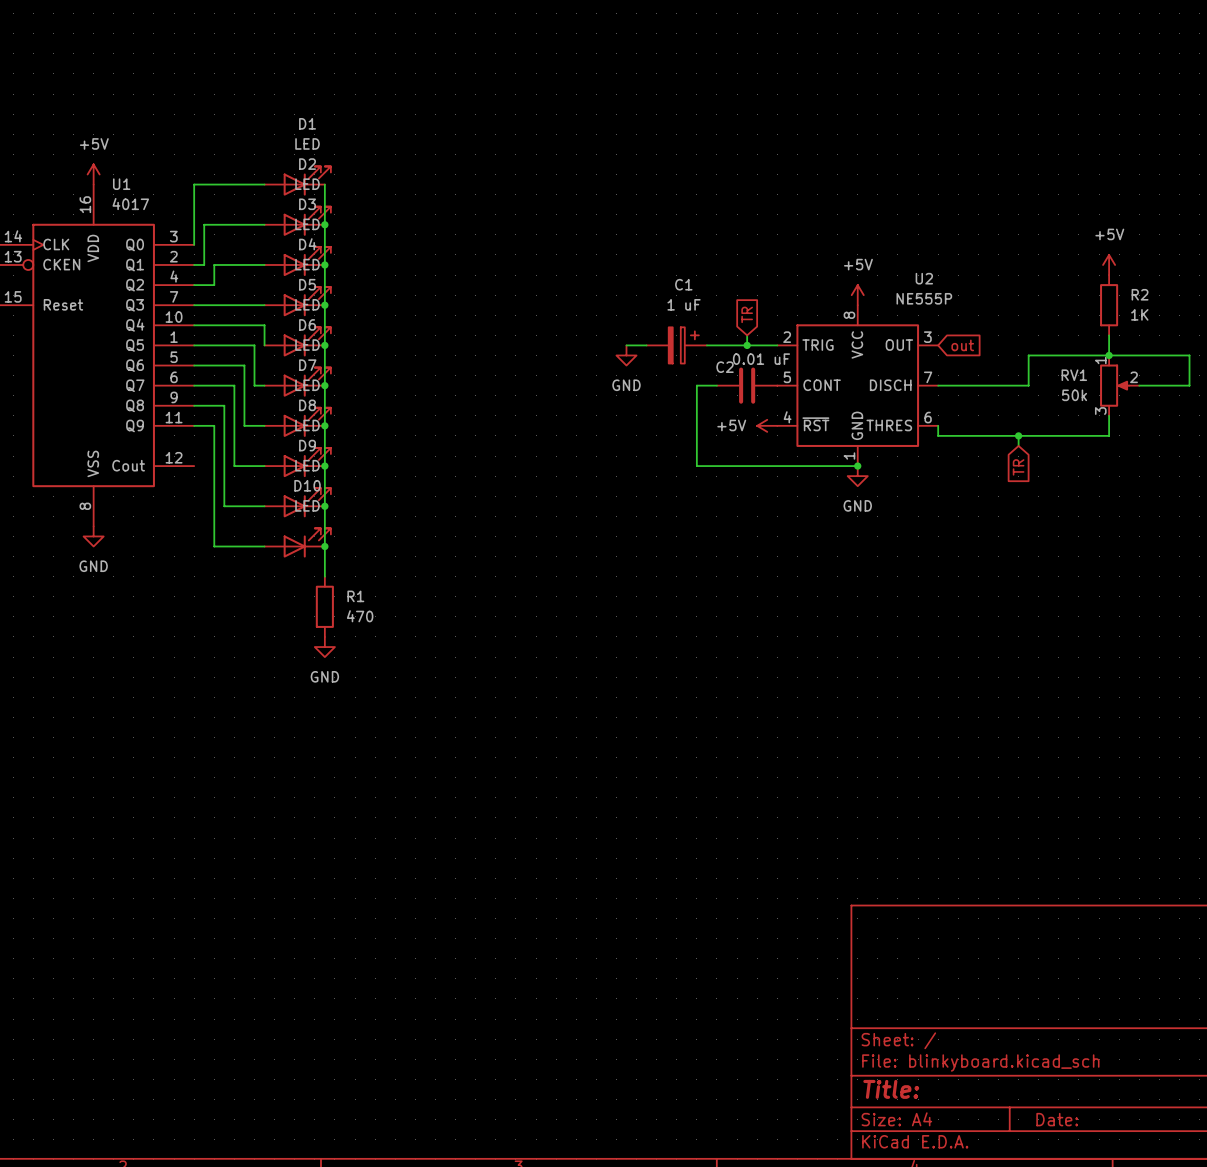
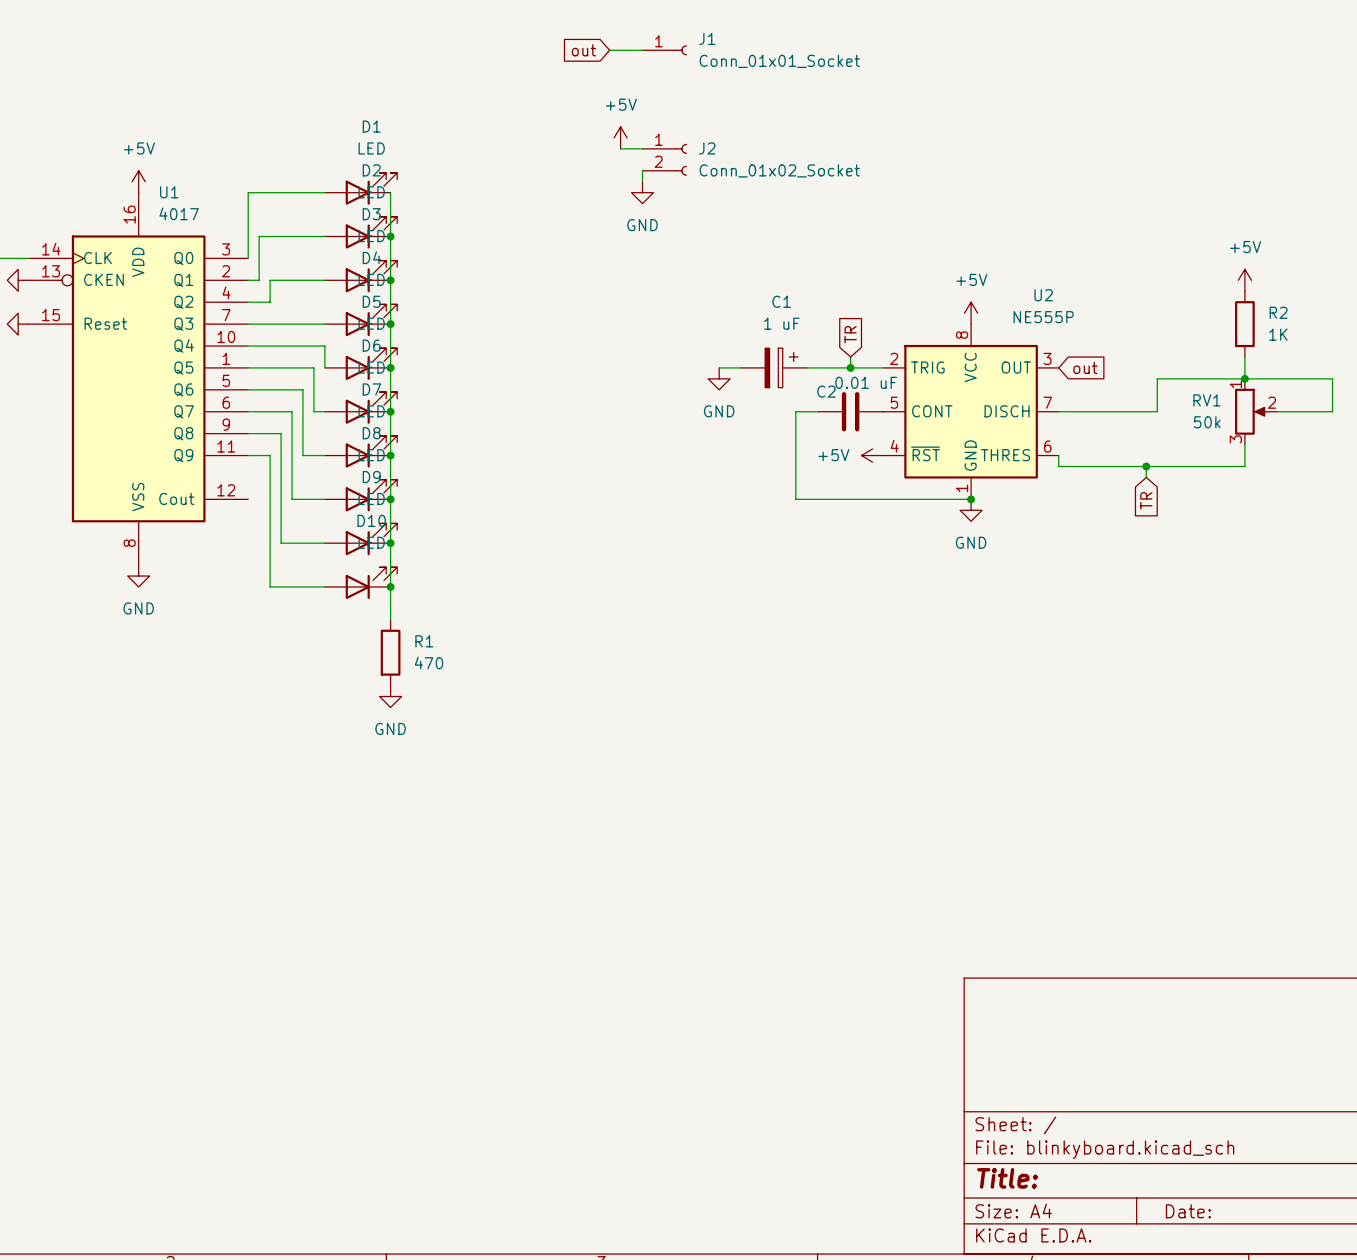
global label: none -> out (583, 50)
wire: none -> (609, 50) (642, 50)
J1: none -> Conn_01x01_Socket (664, 50)
power symbol: none -> +5V (620, 137)
wire: none -> (620, 148) (642, 148)
J2: none -> Conn_01x02_Socket (664, 159)
wire: none -> (642, 170) (642, 181)
power symbol: none -> GND (642, 192)

